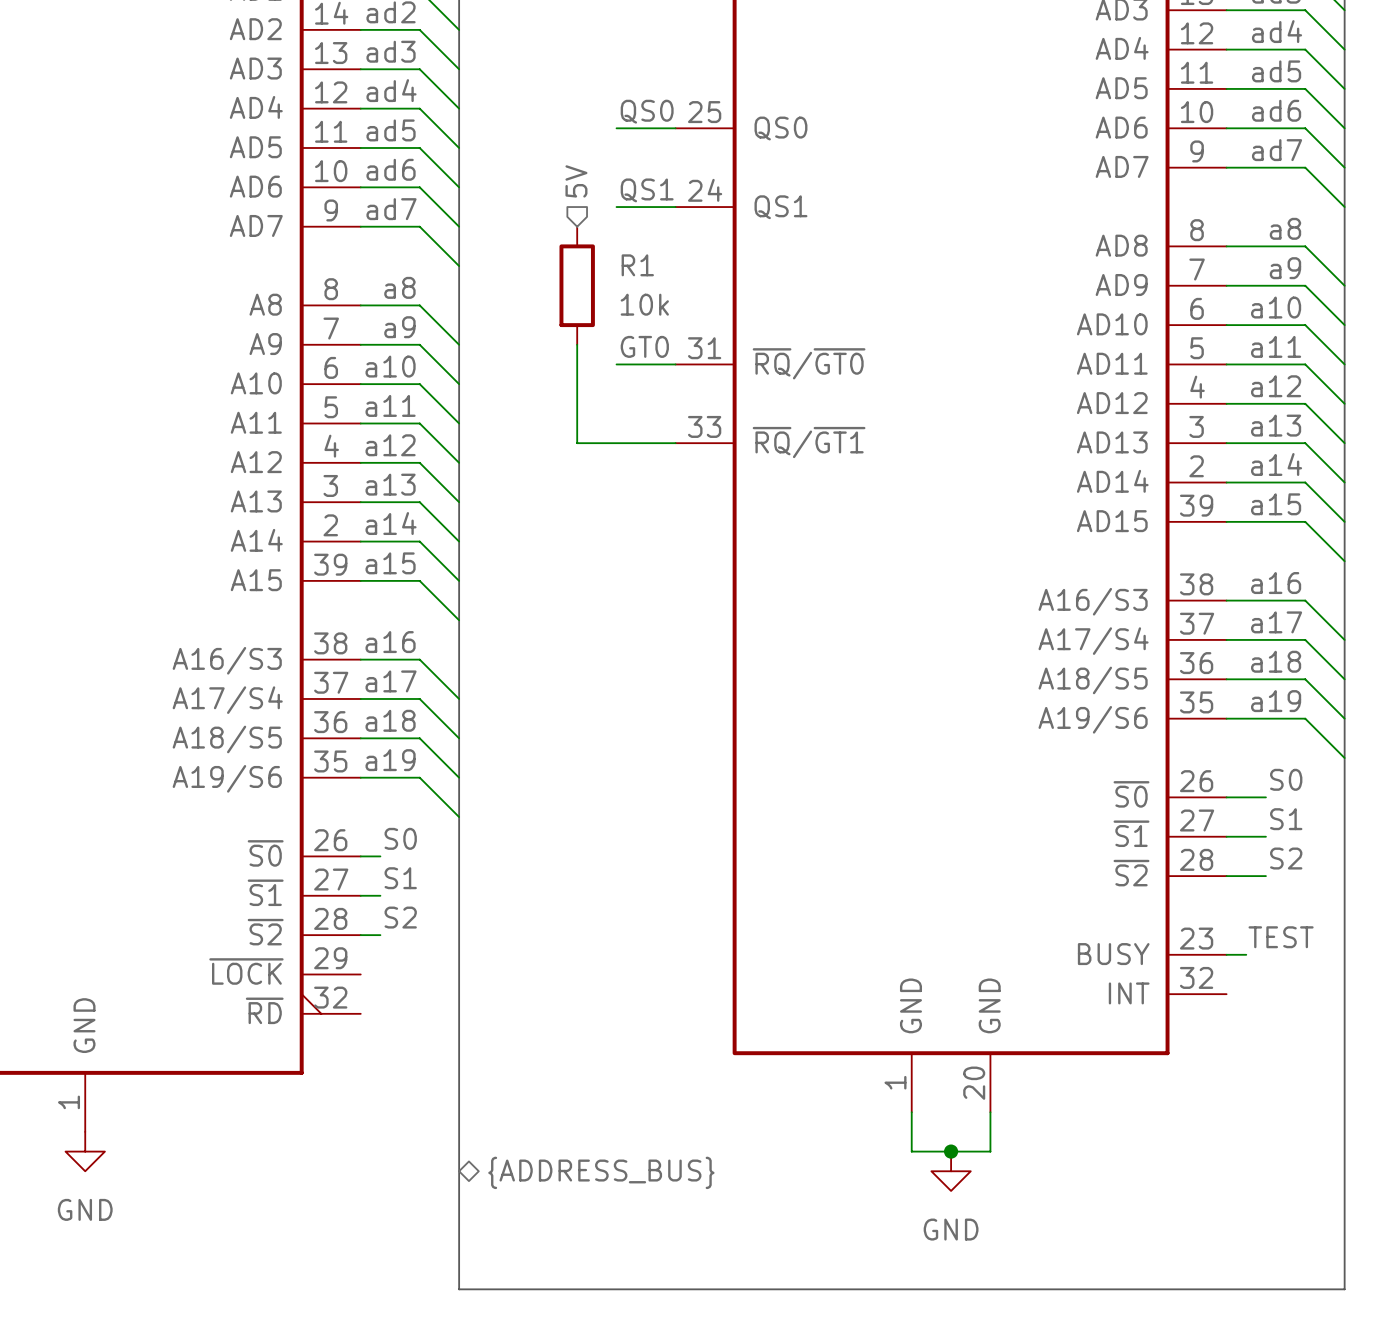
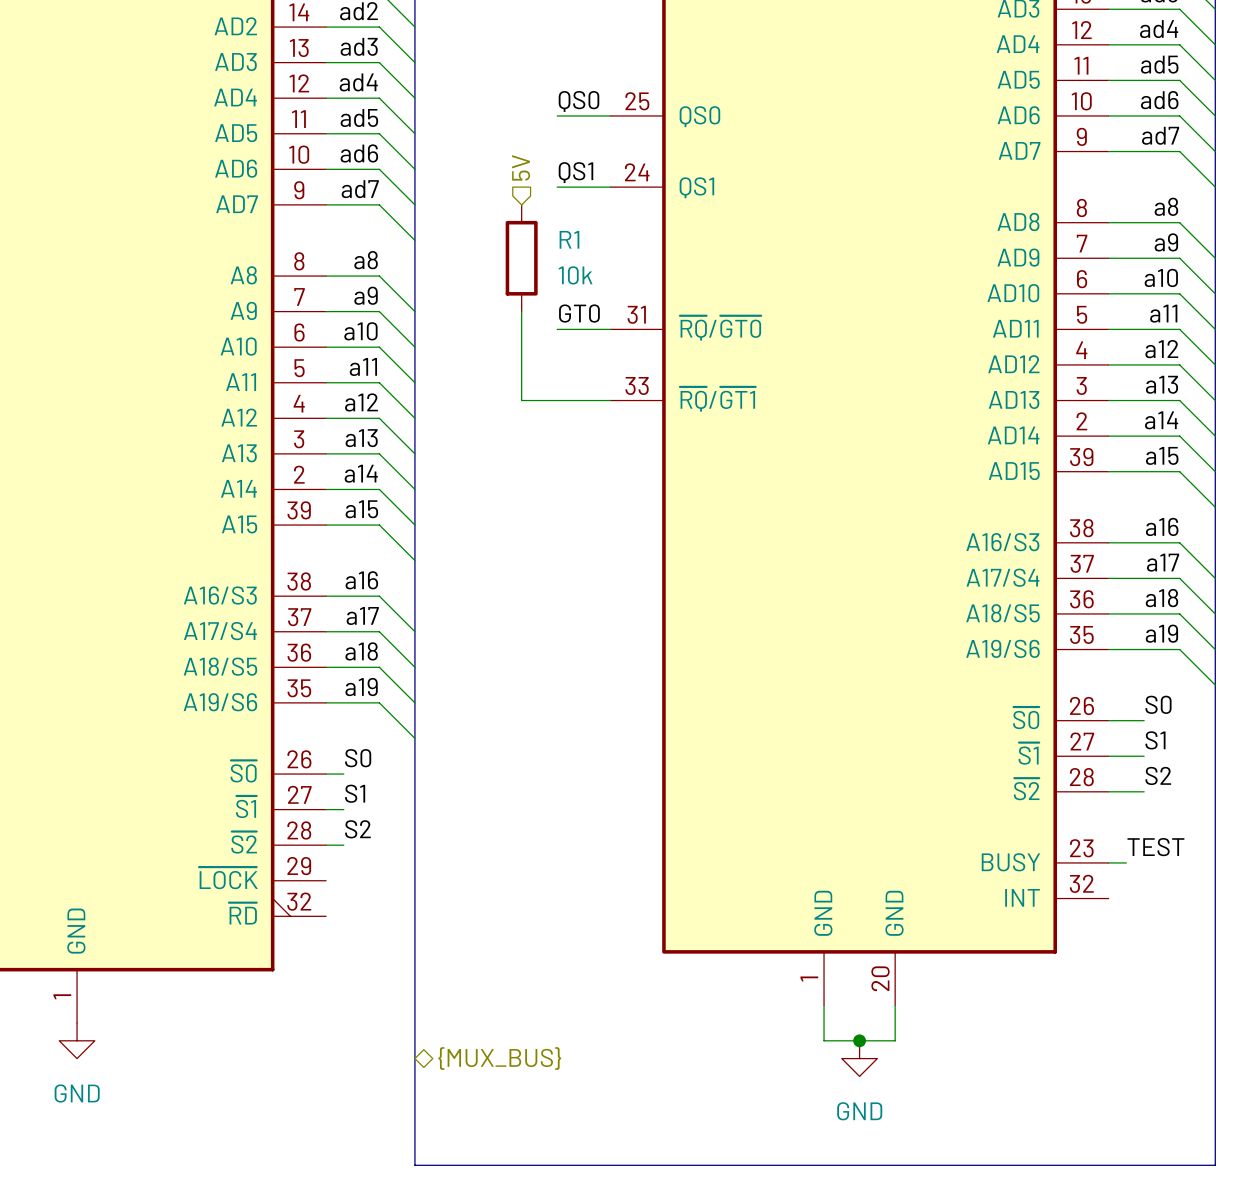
hierarchical label: {ADDRESS_BUS} (601, 1172) -> {MUX_BUS} (499, 1058)

